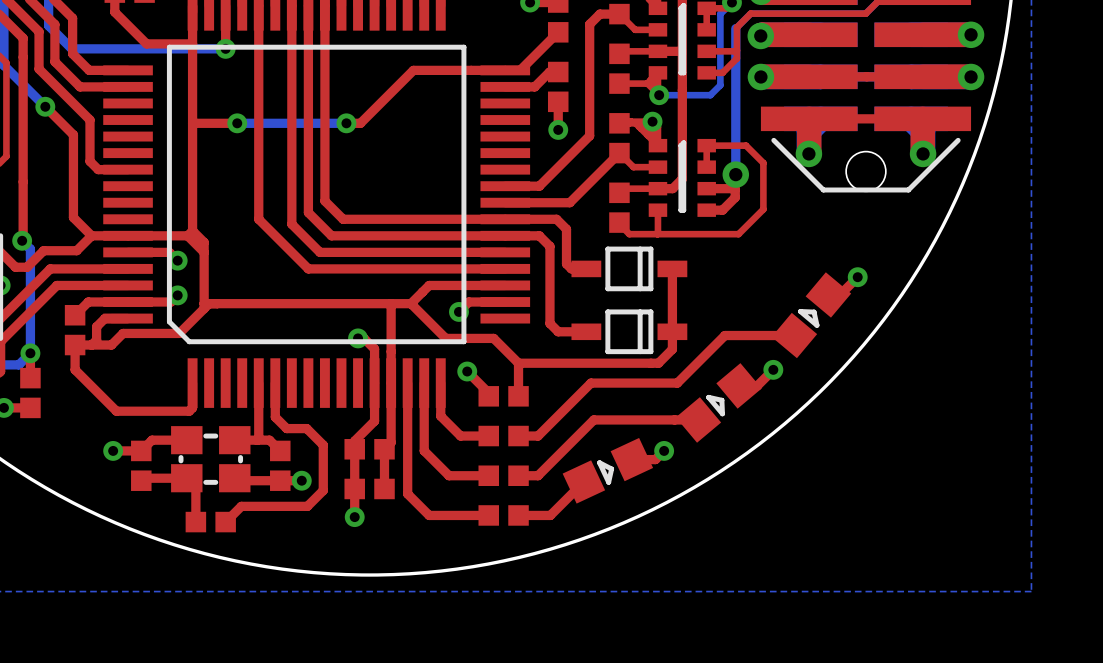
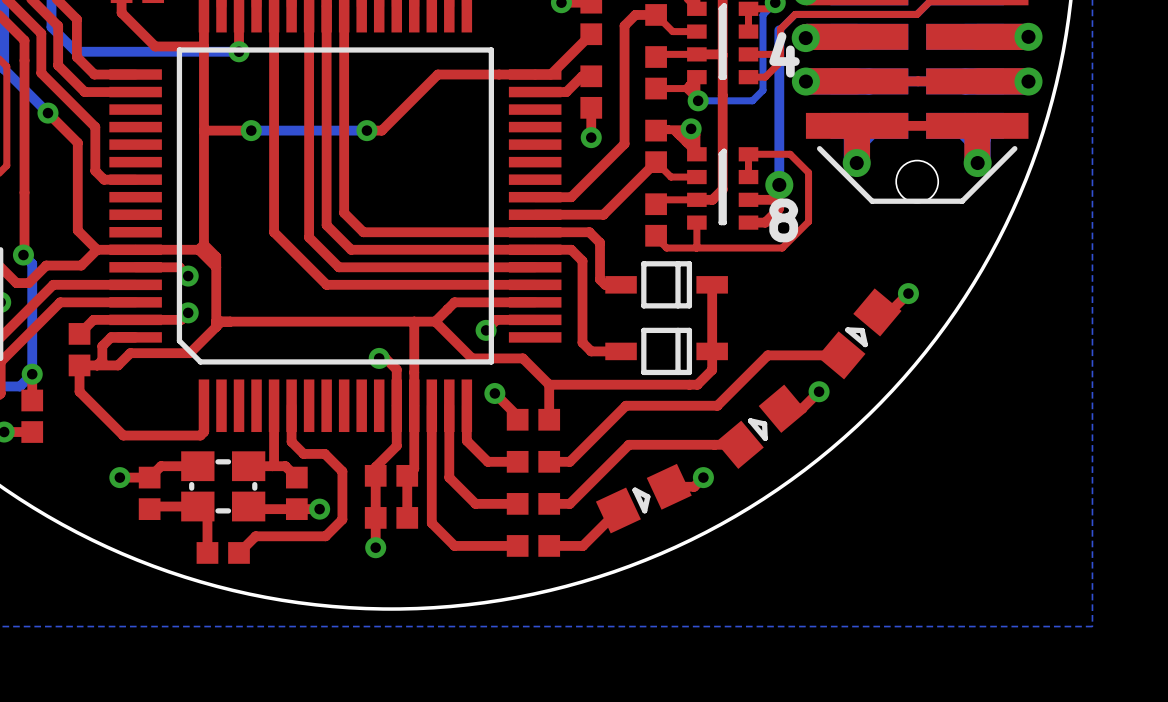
text: none -> 4 (784, 54)
text: none -> 8 (783, 220)

